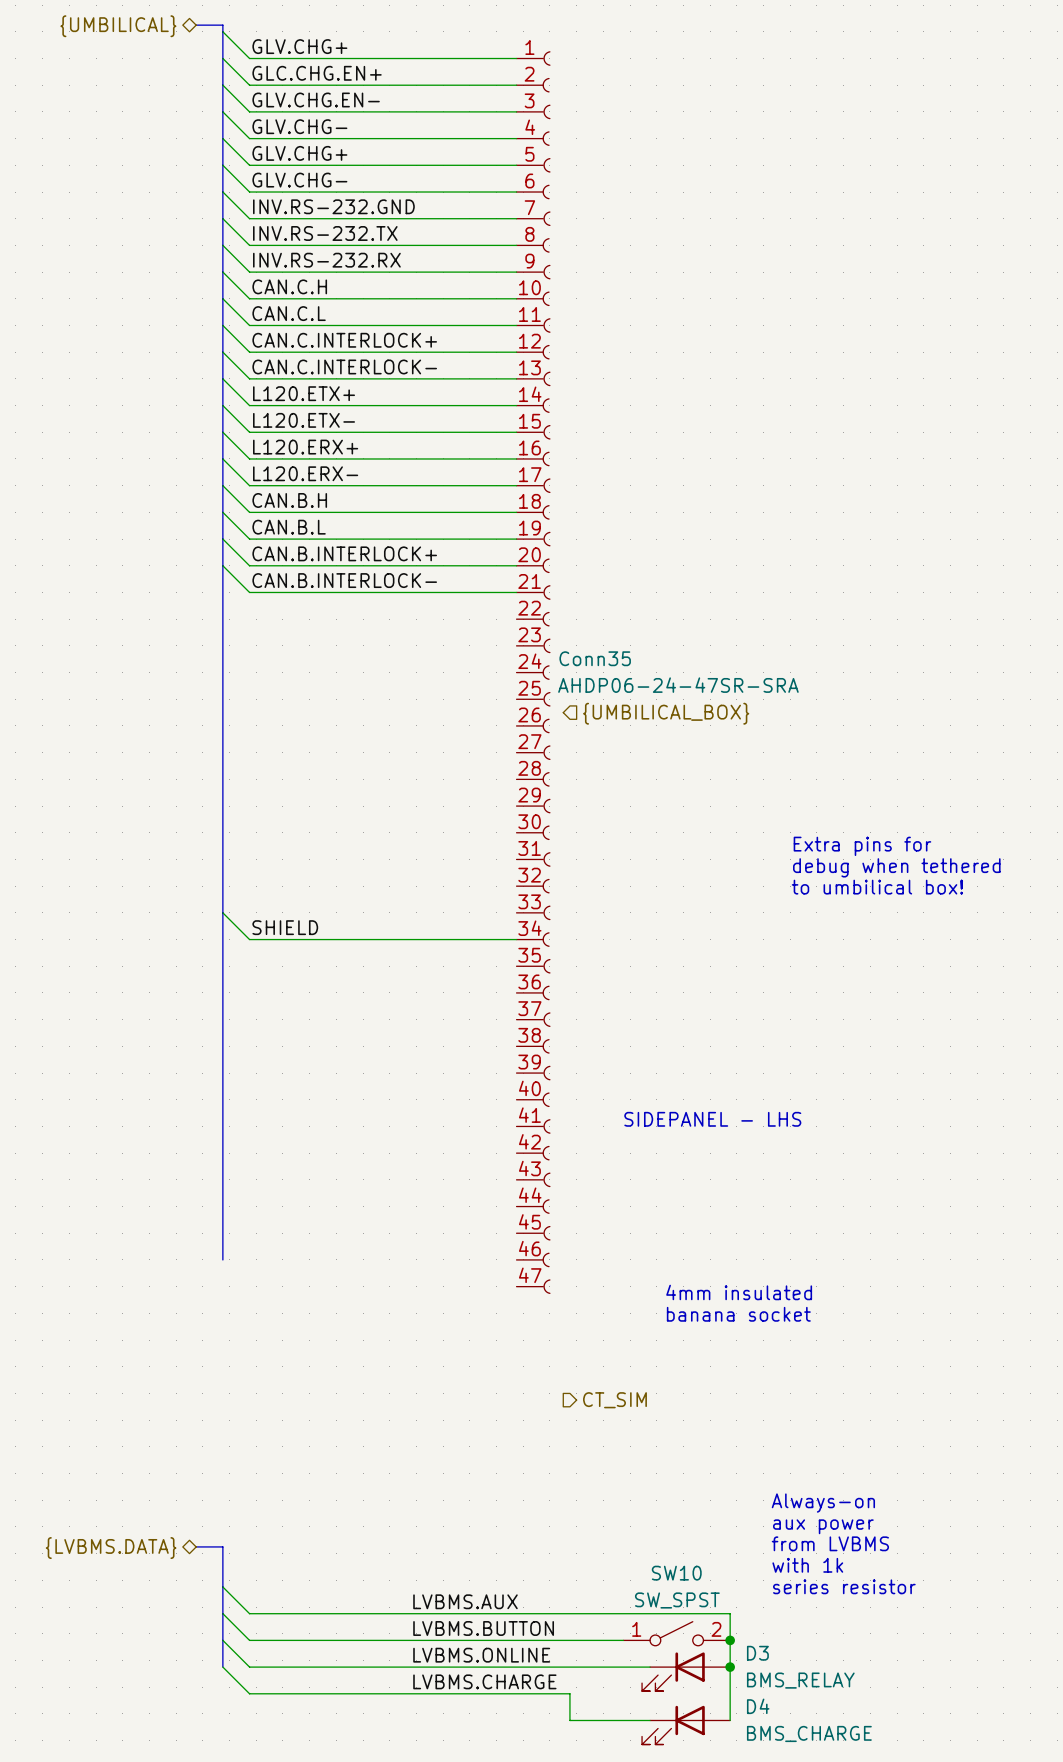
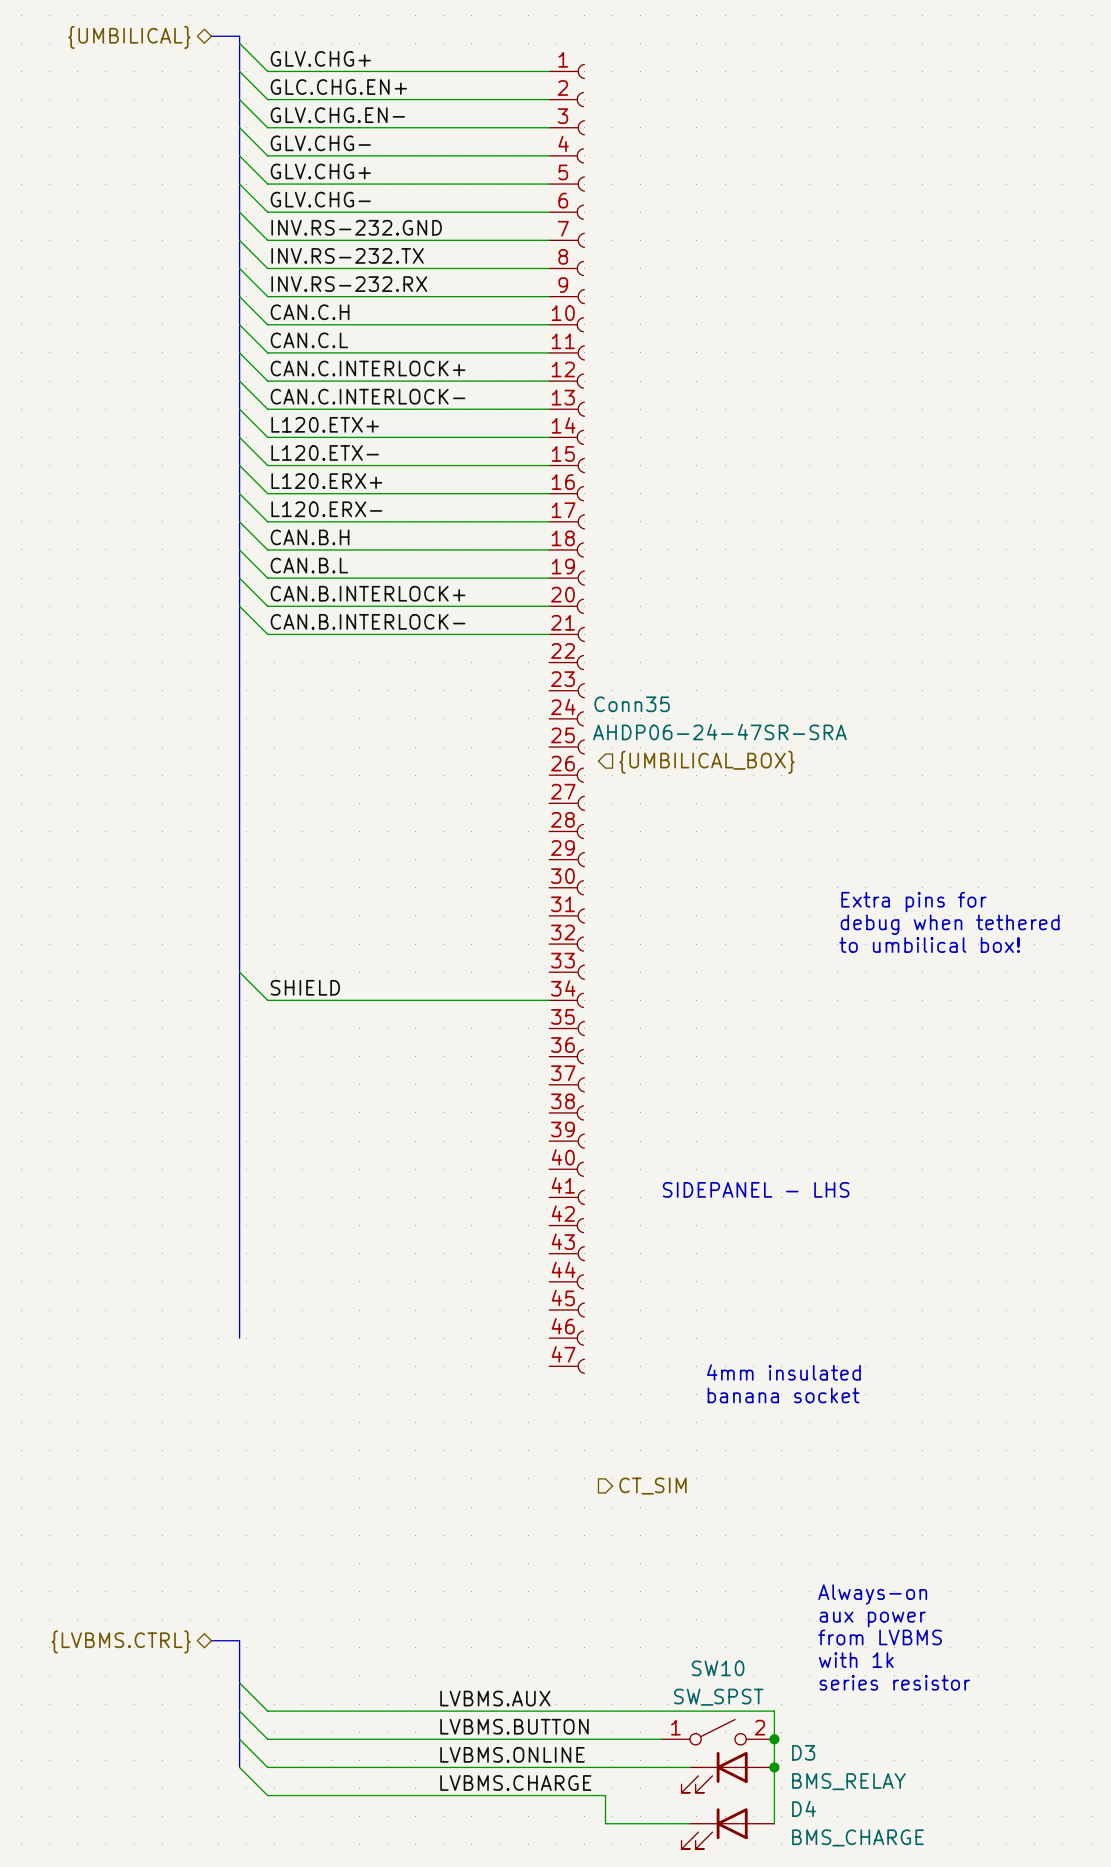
hierarchical label: {LVBMS.DATA} (111, 1548) -> {LVBMS.CTRL} (121, 1641)

